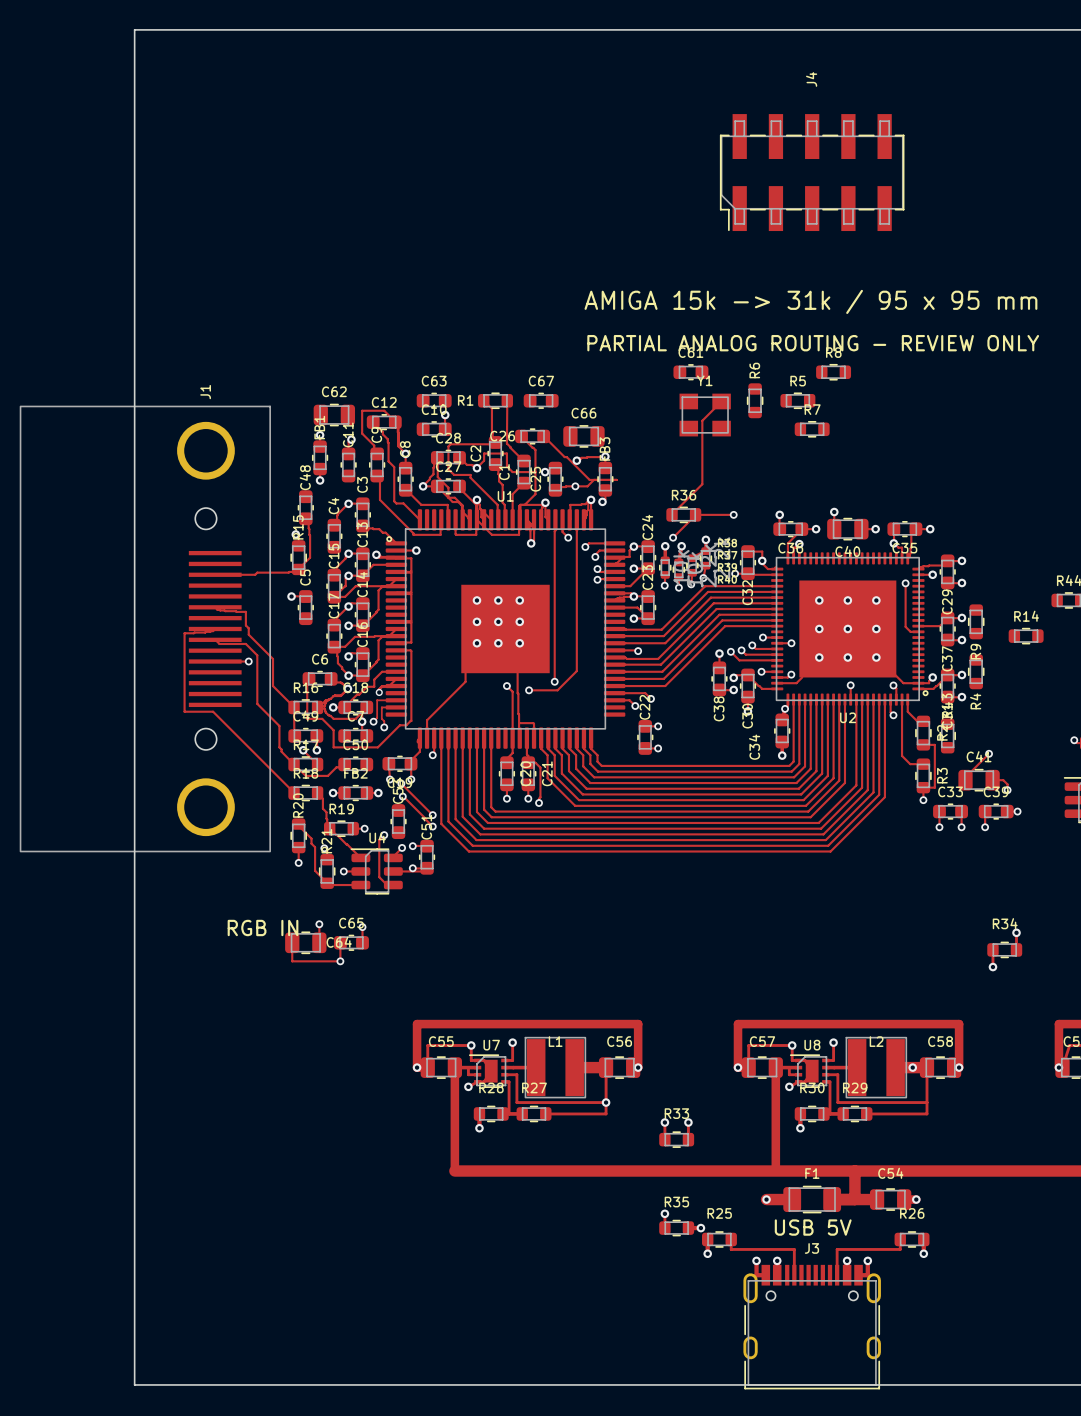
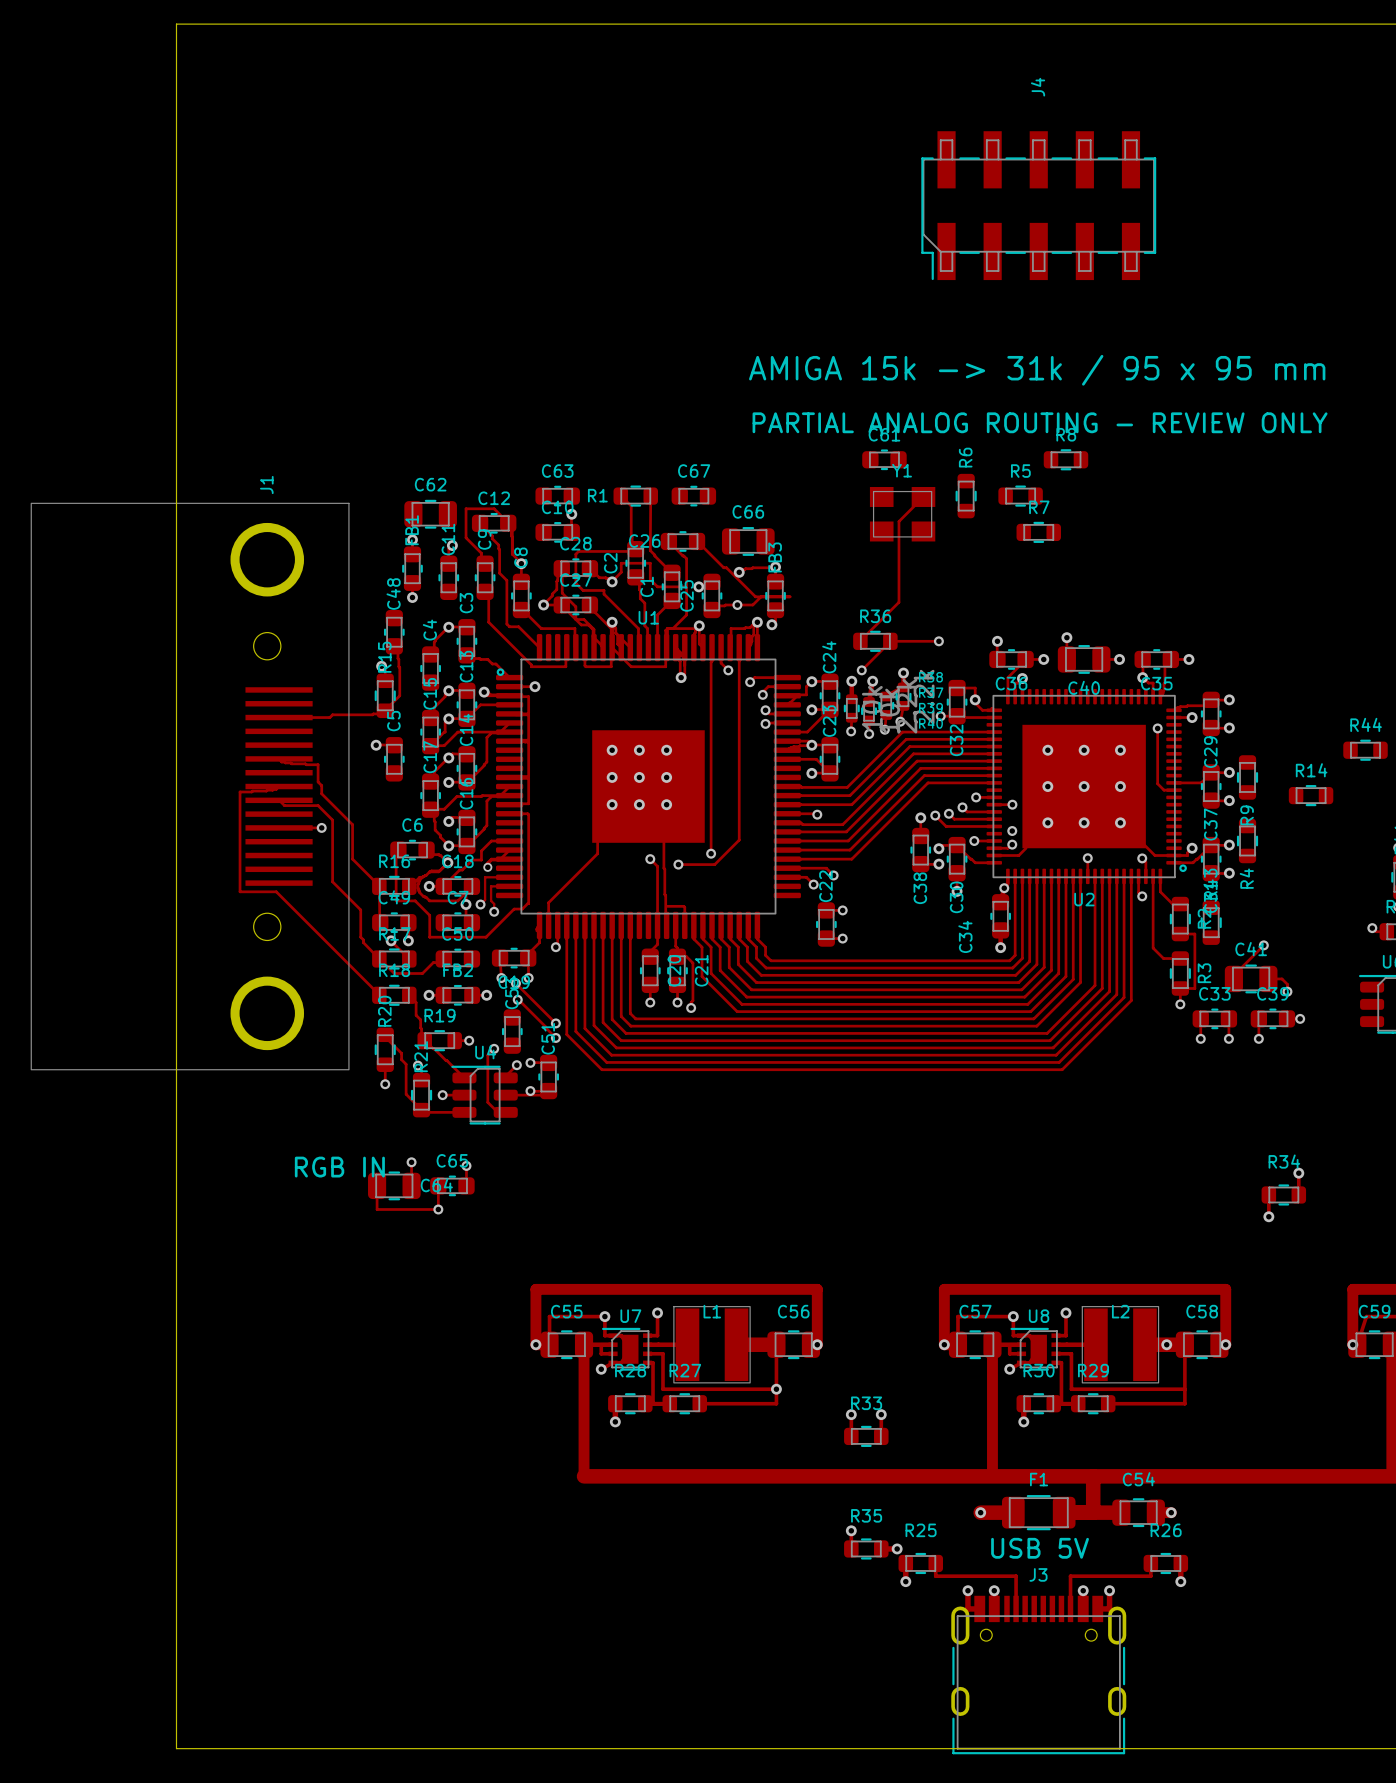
via: none -> (1012, 831)

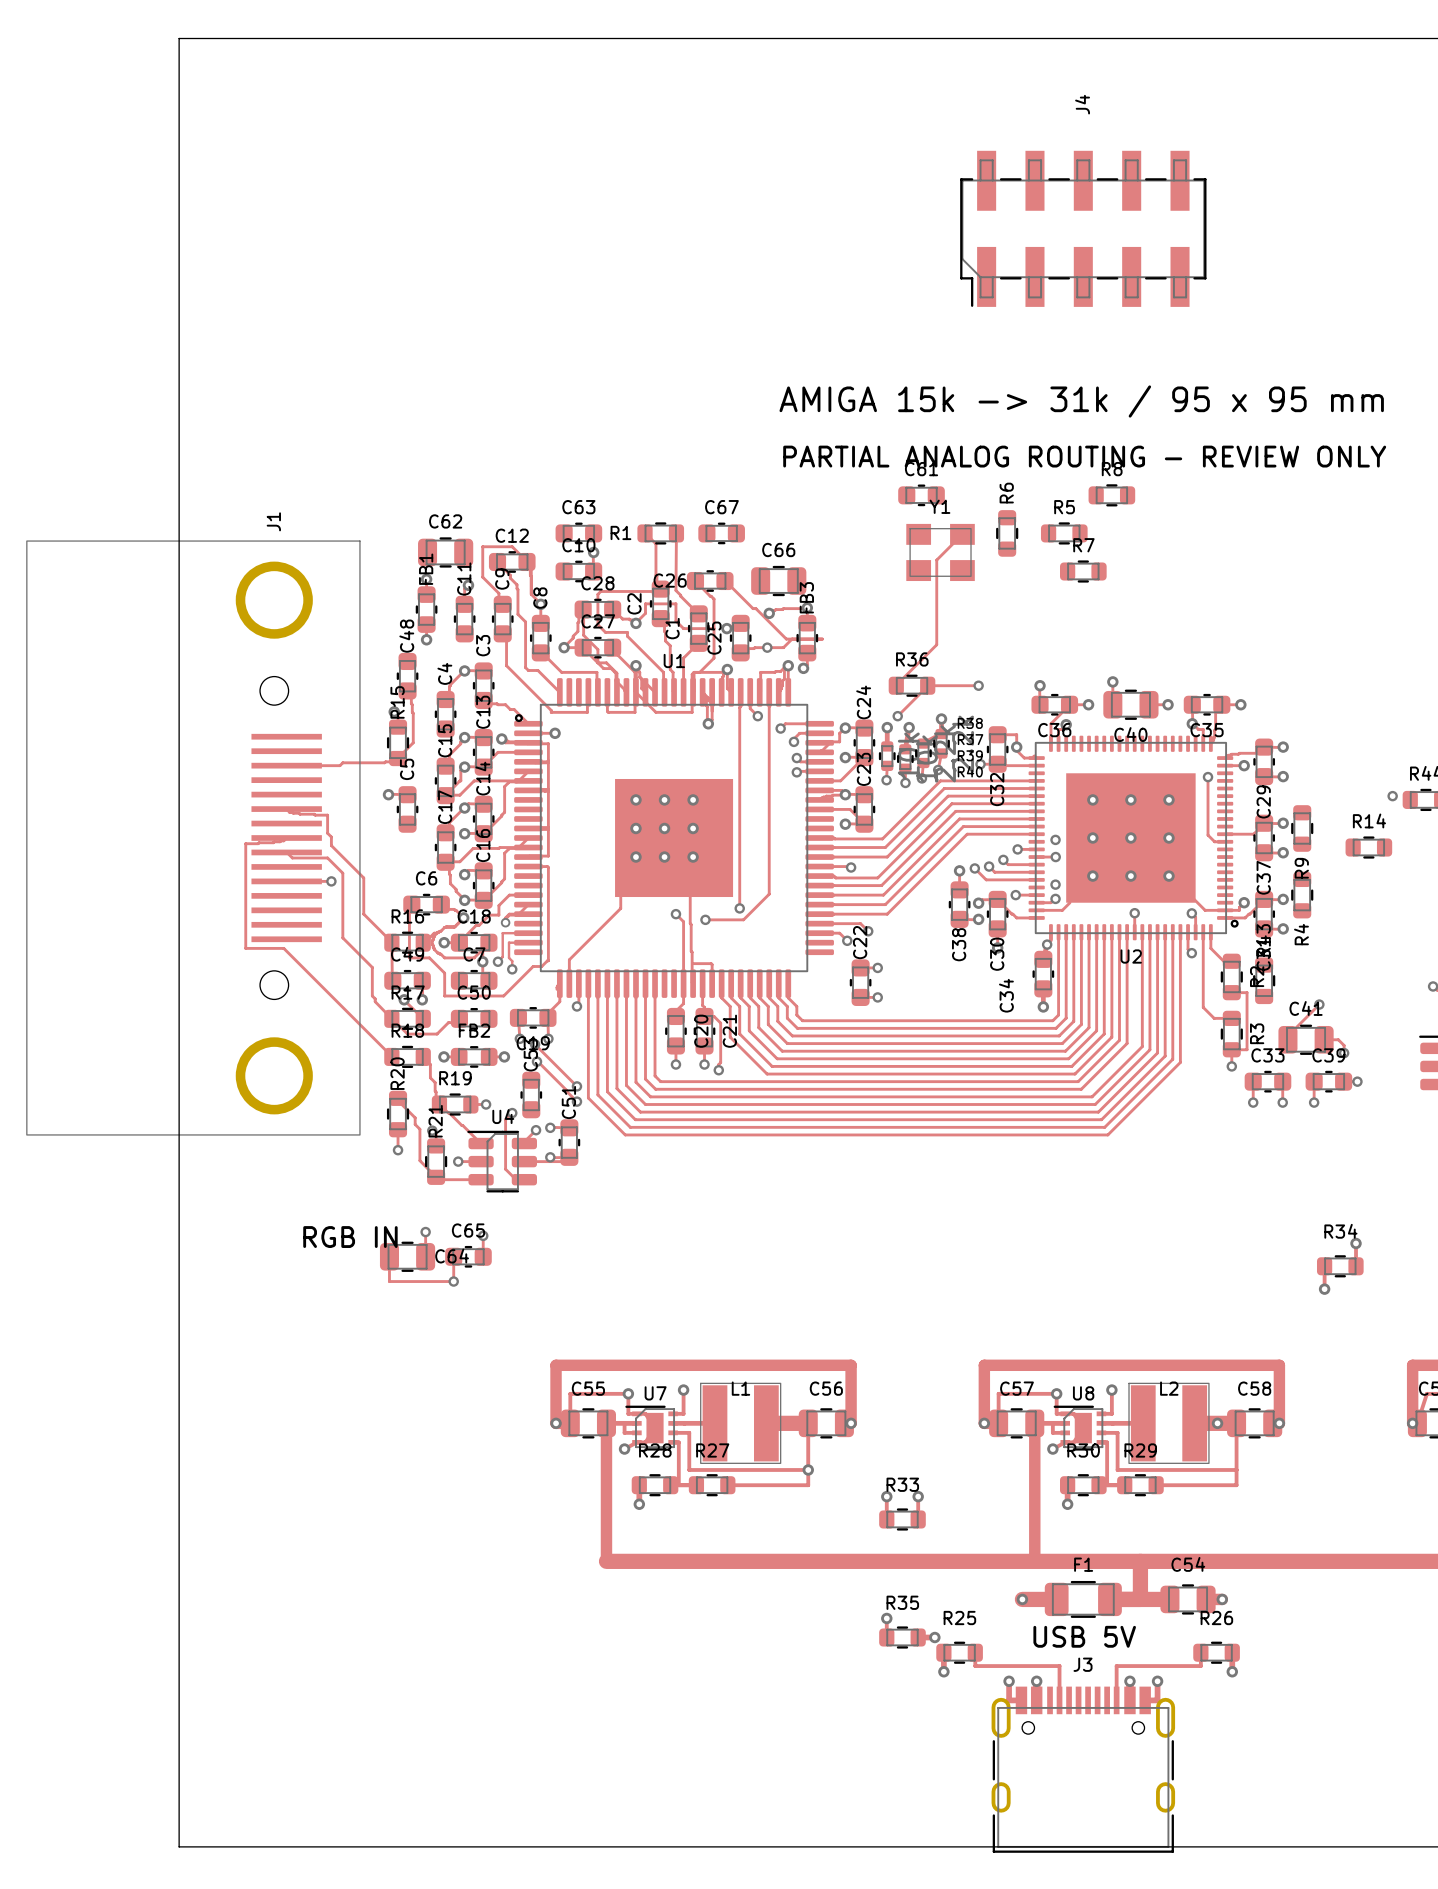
via: none -> (1392, 796)
via: none -> (1055, 839)

